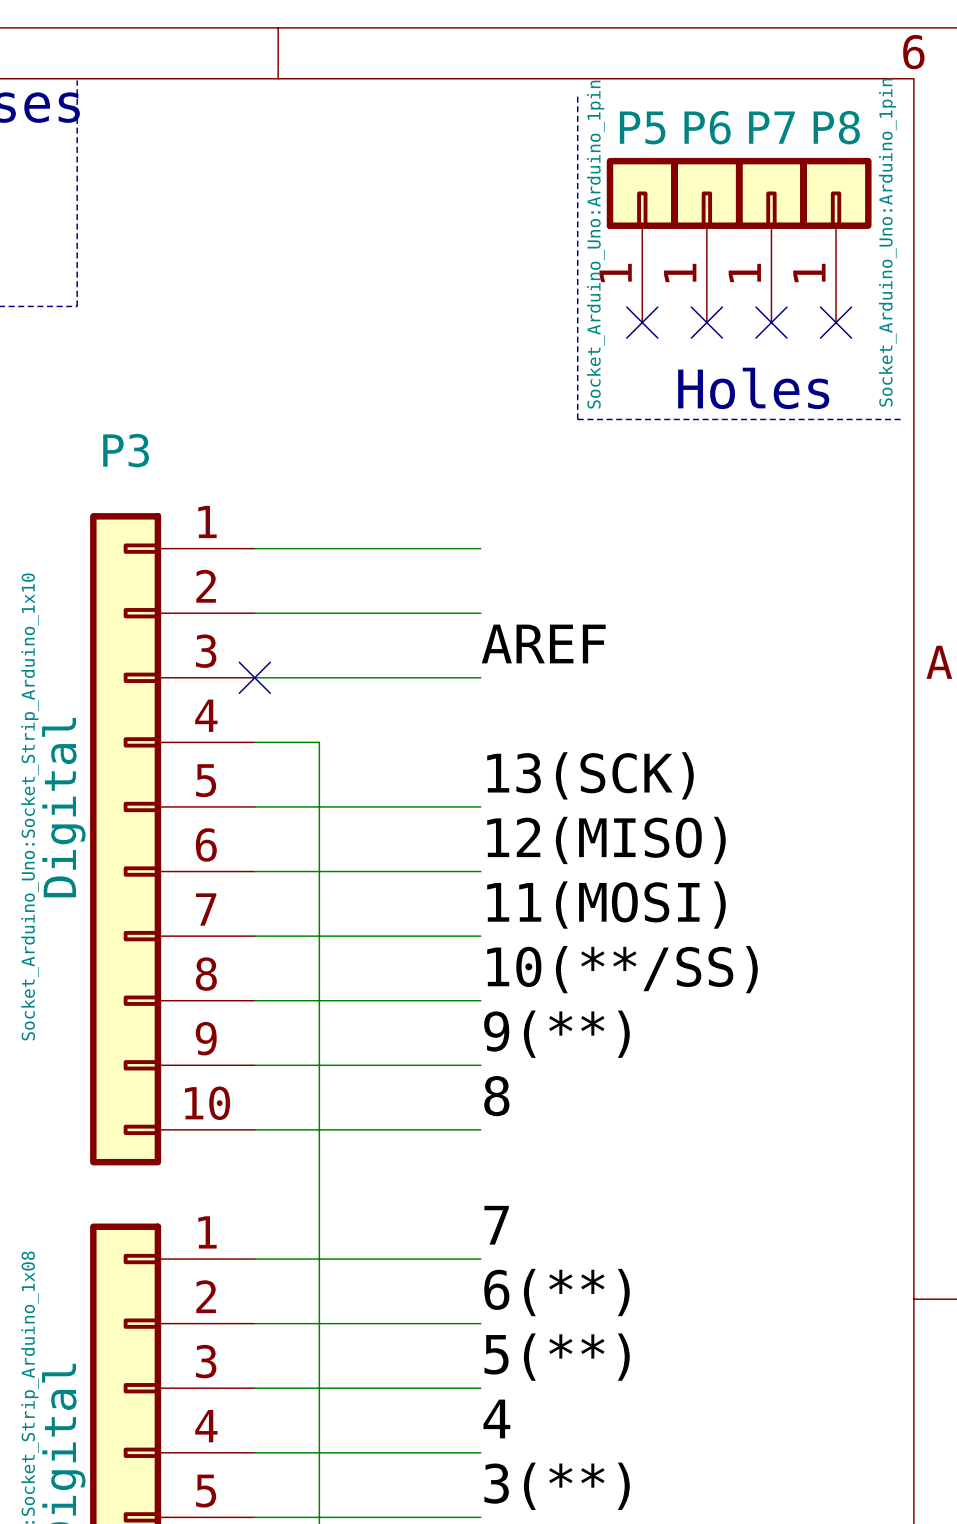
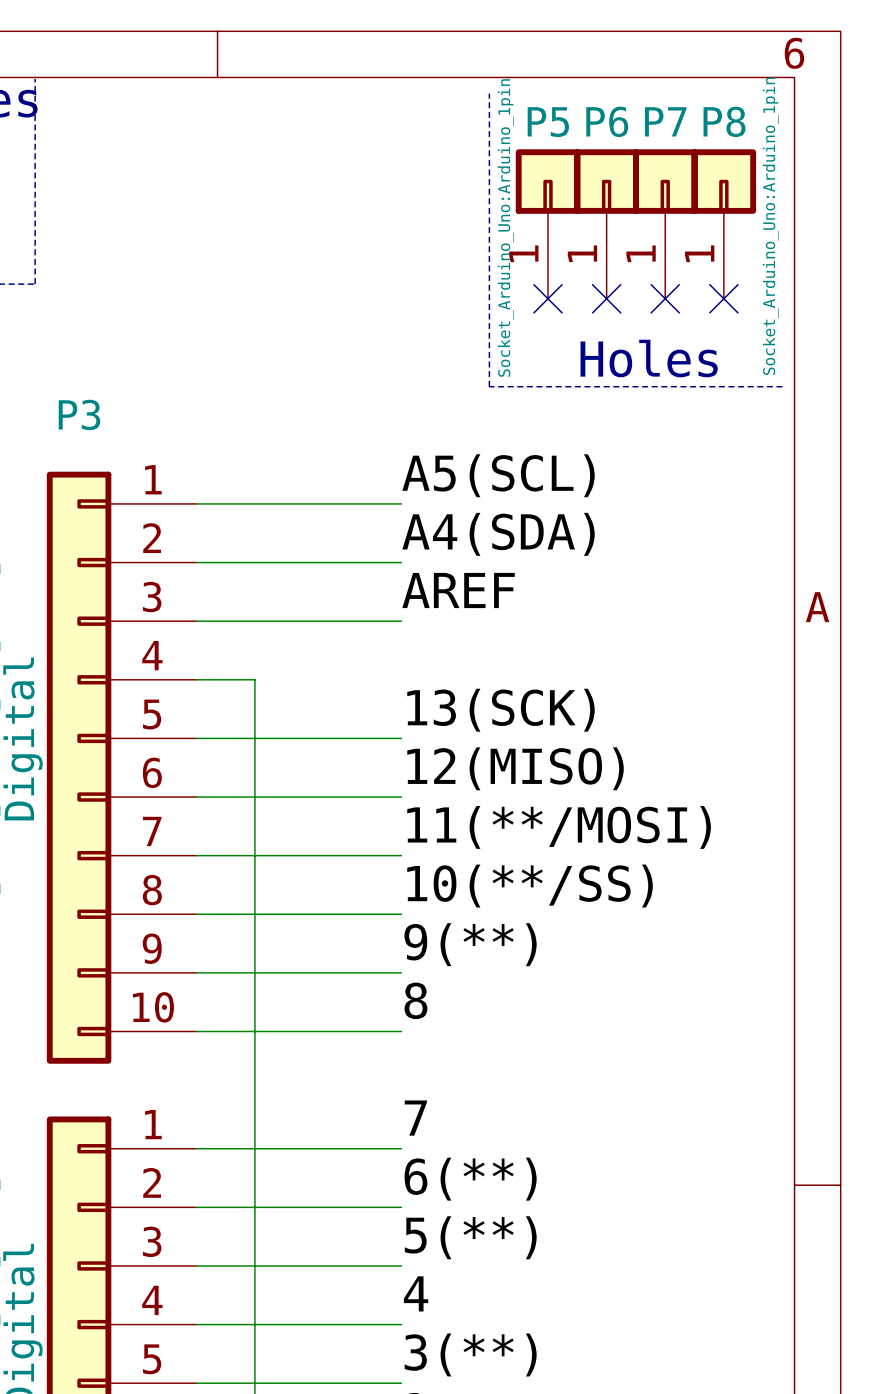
label: none -> A5(SCL) (498, 475)
label: none -> A4(SDA) (498, 534)
no-connect mark: (254, 677) -> none
label: 11(MOSI) (606, 905) -> 11(**/MOSI) (559, 827)

